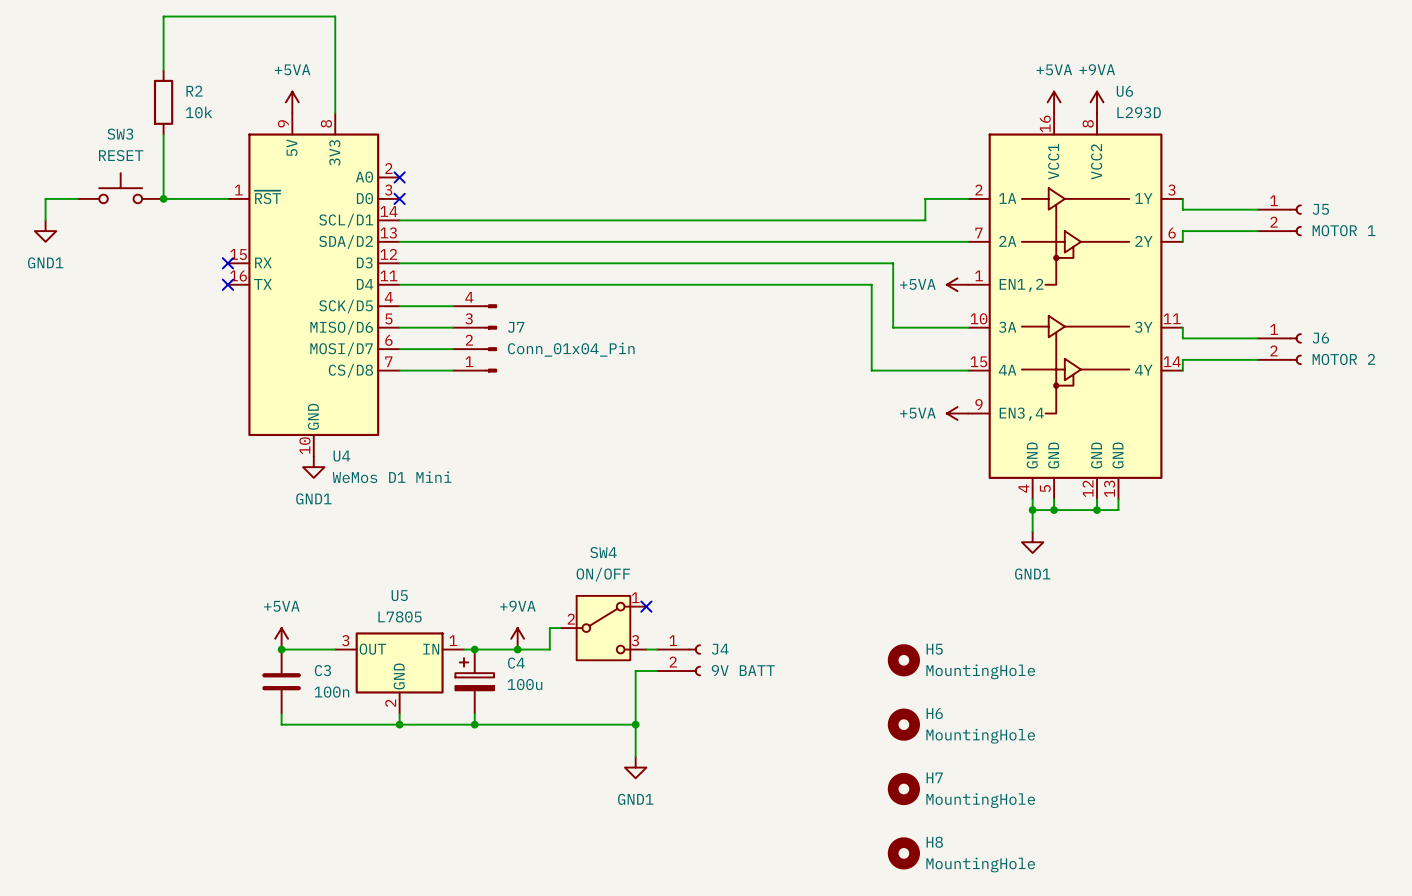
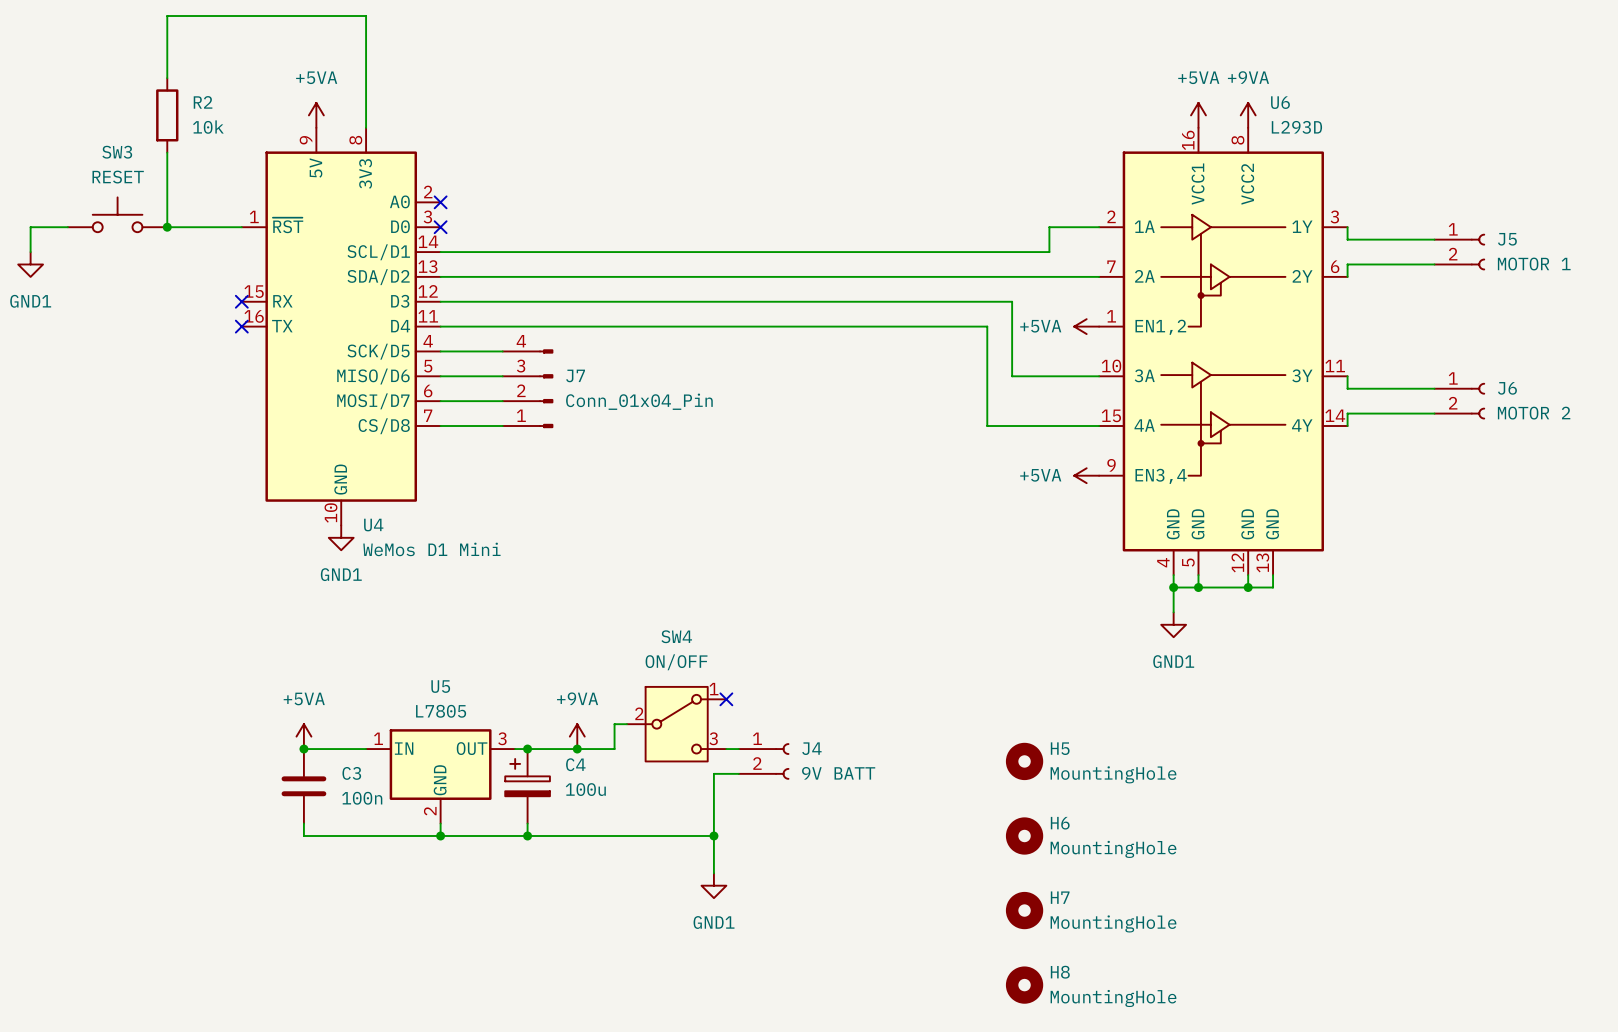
U5 flip: as is (399, 662) -> left-right (440, 764)

